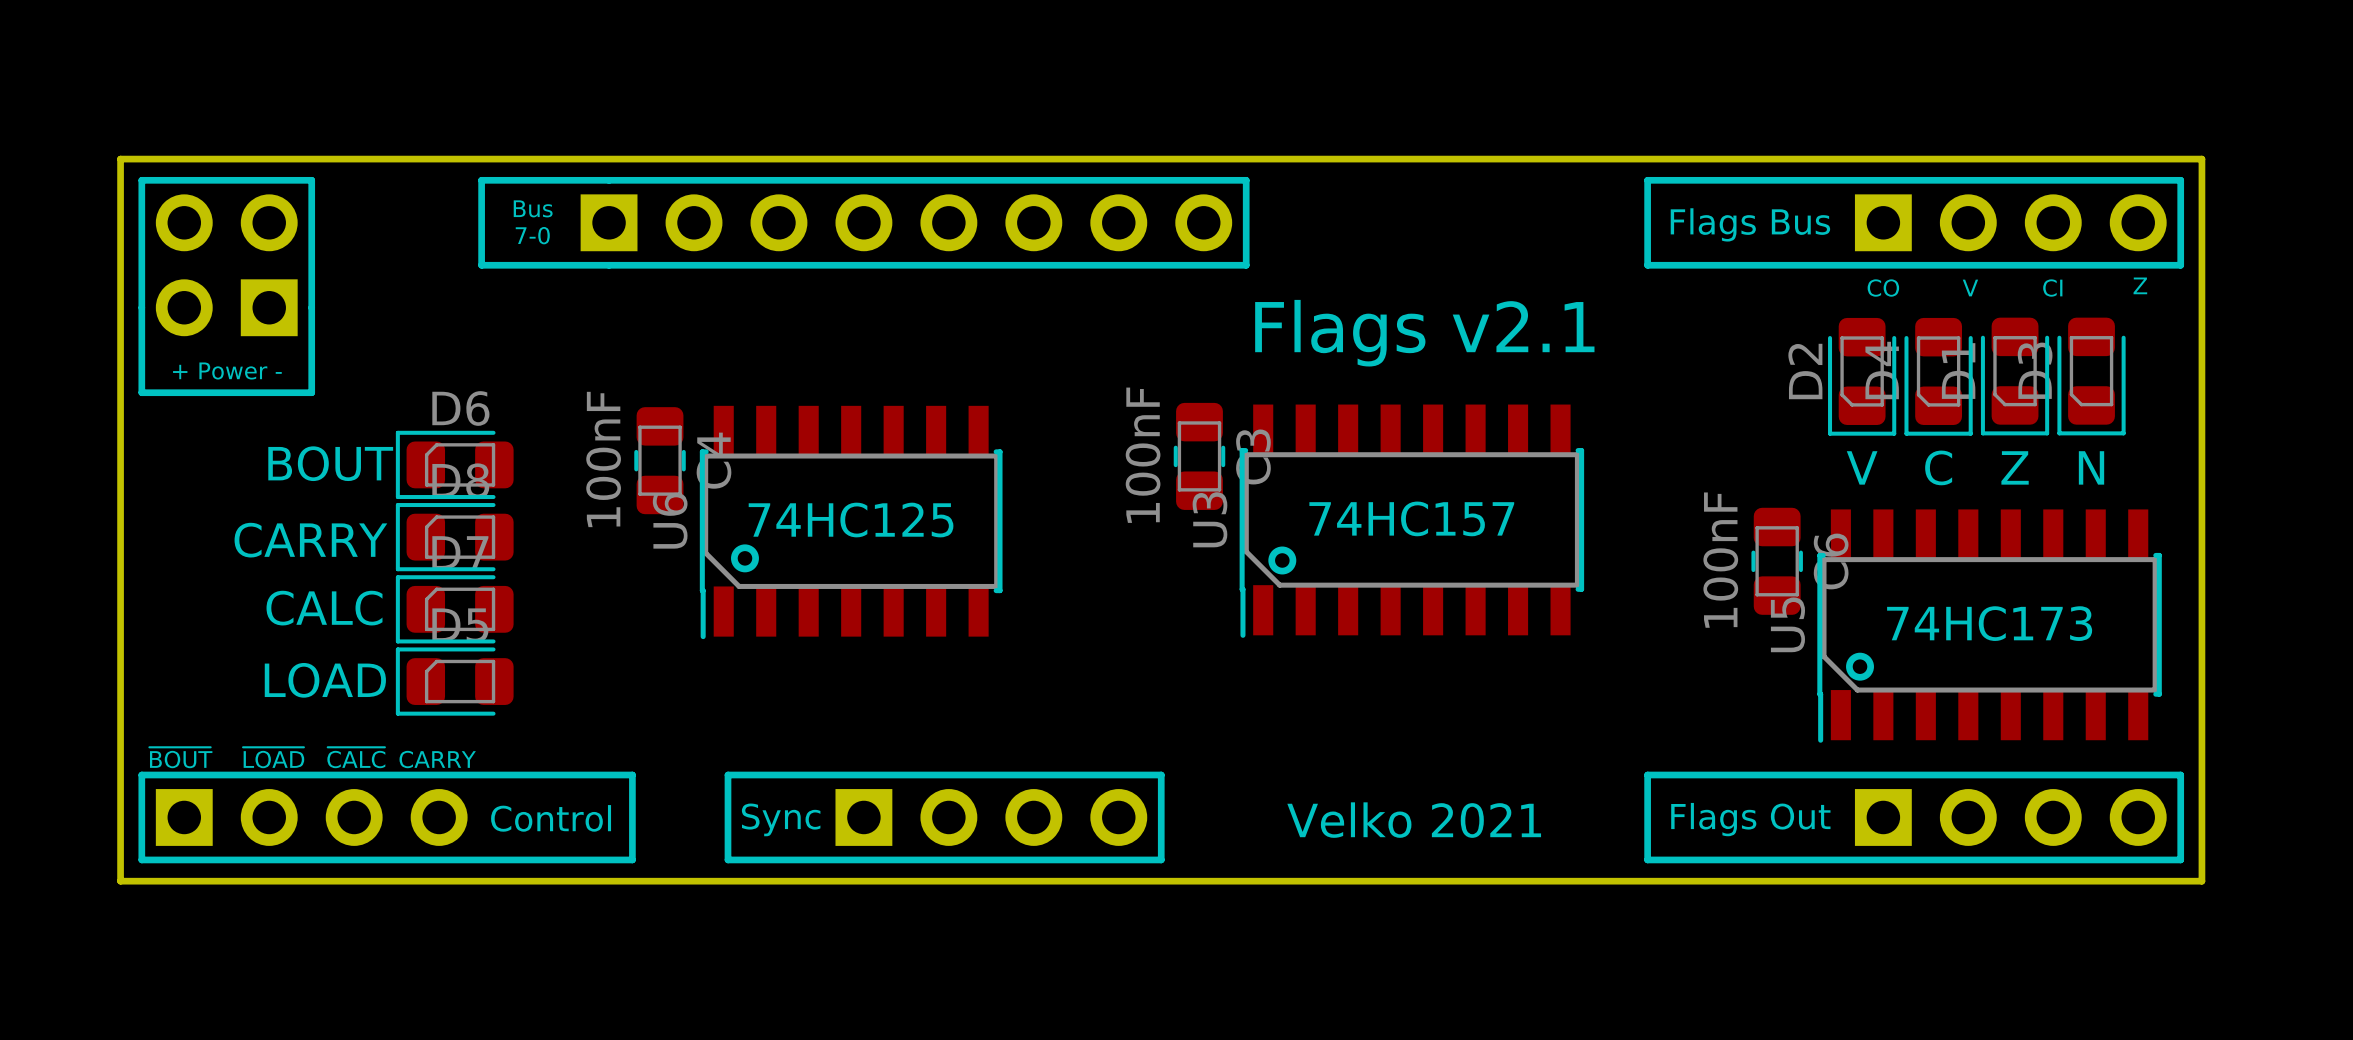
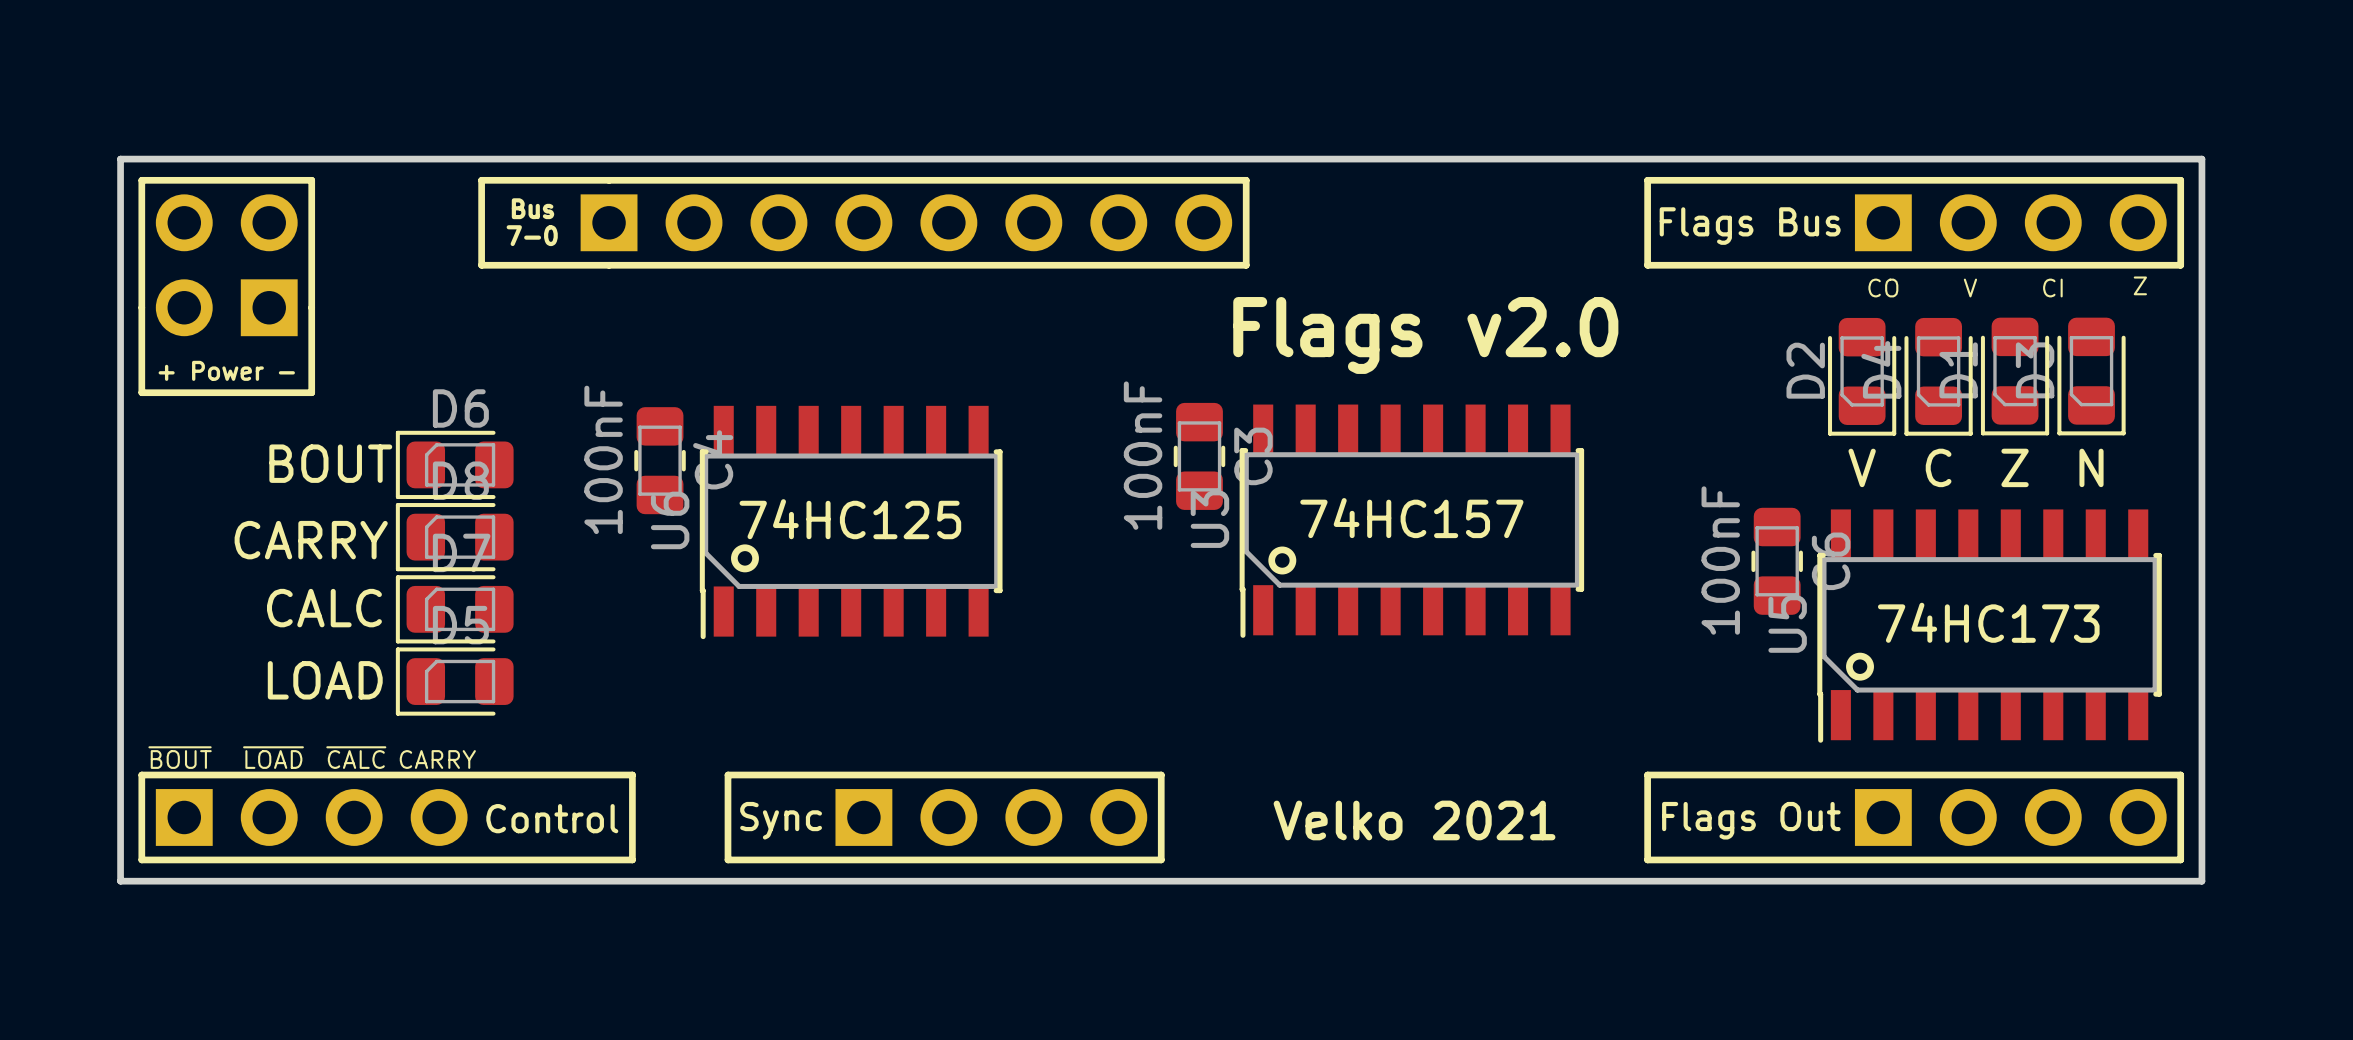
text: Flags v2.1 (1424, 333) -> Flags v2.0 (1425, 335)

